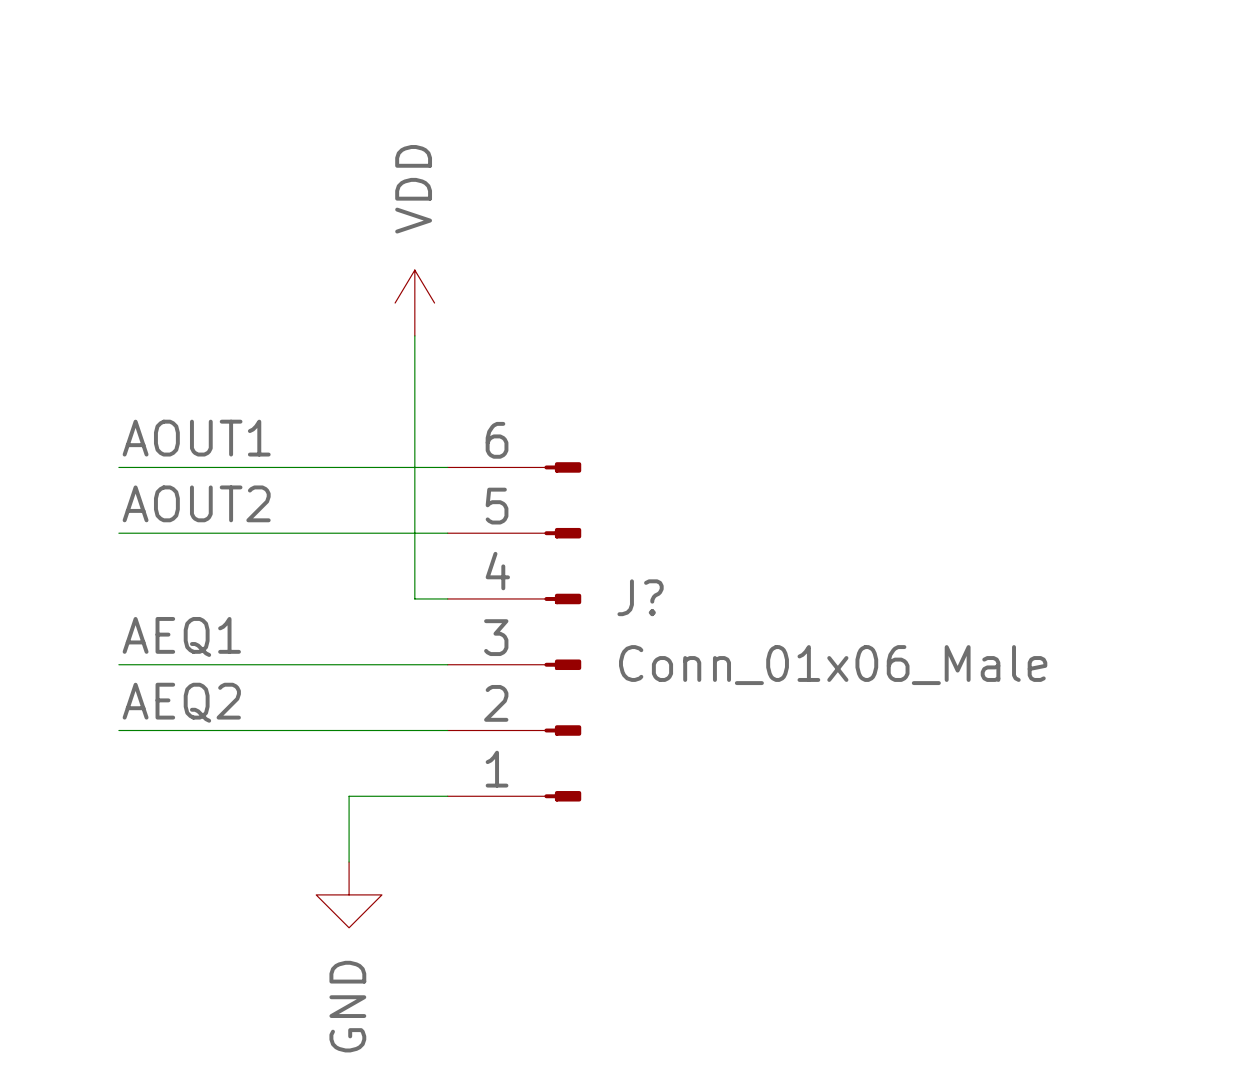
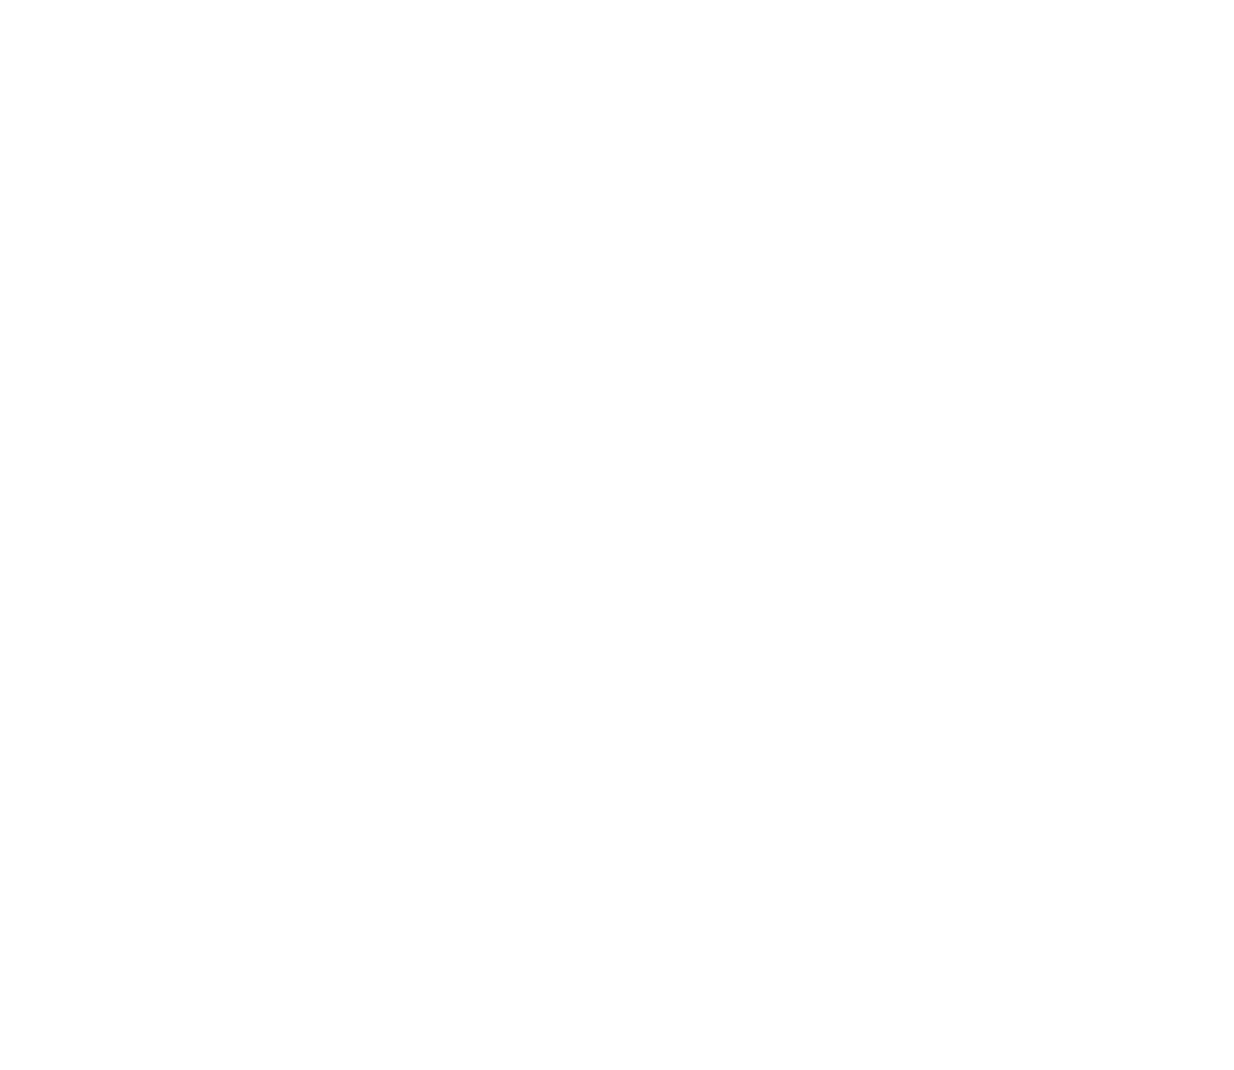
power symbol: VDD (414, 303) -> none
wire: (414, 335) (414, 598) (447, 598) -> none
label: AOUT1 (196, 438) -> none
wire: (118, 467) (447, 467) -> none
label: AOUT2 (196, 503) -> none
wire: (118, 533) (447, 533) -> none
J?: Conn_01x06_Male (514, 631) -> none
label: AEQ1 (181, 636) -> none
wire: (118, 664) (447, 664) -> none
label: AEQ2 (181, 702) -> none
wire: (118, 730) (447, 730) -> none
wire: (447, 796) (349, 796) (349, 862) -> none
power symbol: GND (349, 894) -> none

